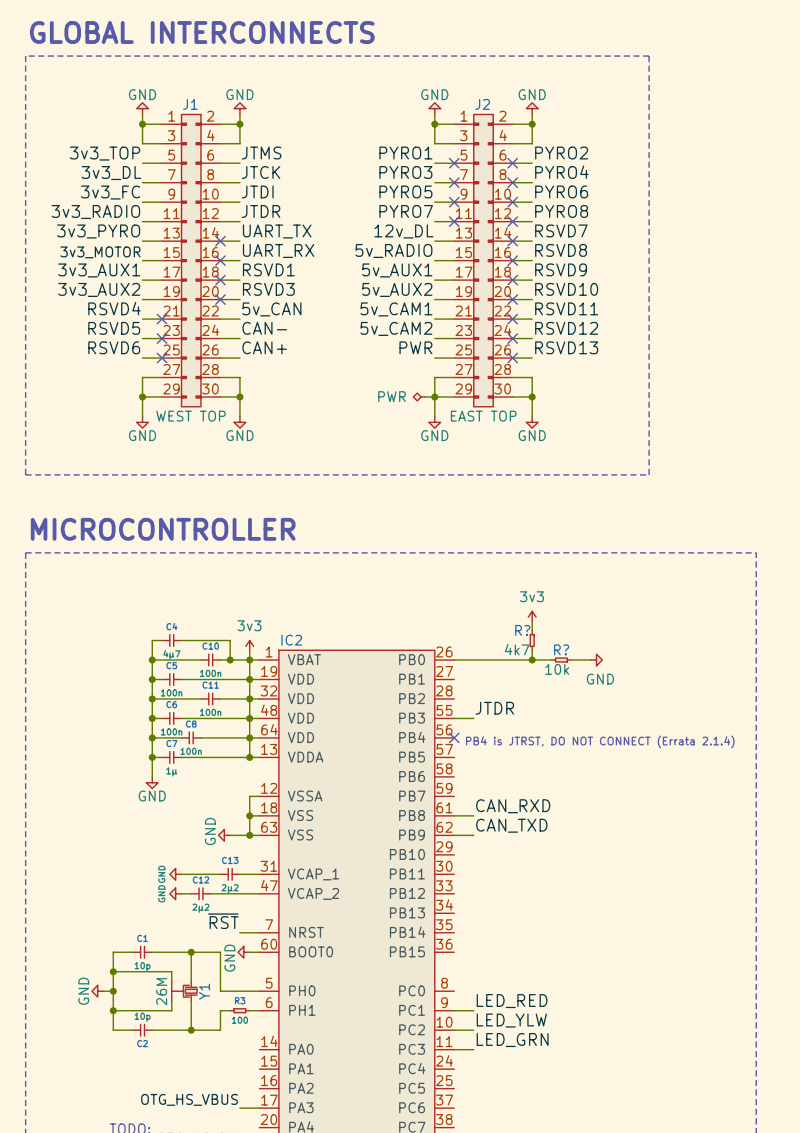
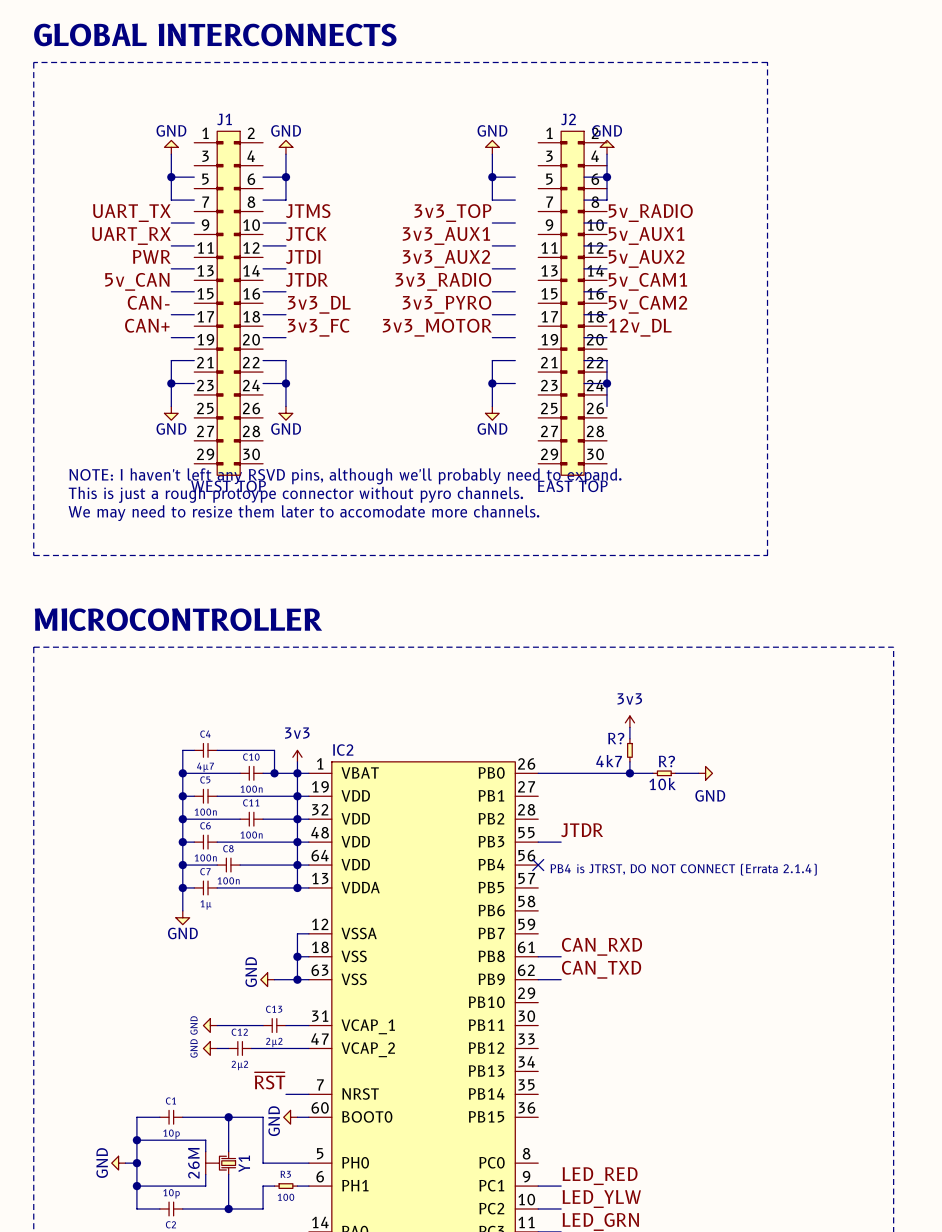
power symbol position: GND (142, 108) -> GND (171, 147)
power symbol position: GND (239, 108) -> GND (285, 147)
power symbol position: GND (434, 108) -> GND (492, 147)
power symbol position: GND (532, 108) -> GND (607, 147)
wire: (434, 114) (434, 143) (454, 143) -> none
wire: (532, 114) (532, 143) (512, 143) -> none
wire: (142, 124) (162, 124) -> none
junction position: (142, 124) -> (171, 177)
wire: (220, 124) (239, 124) -> none
junction position: (239, 124) -> (285, 177)
wire: (434, 124) (454, 124) -> none
junction position: (434, 124) -> (492, 177)
wire: (512, 124) (532, 124) -> none
junction position: (532, 124) -> (607, 177)
wire: none -> (492, 154) (492, 200) (515, 200)
wire: none -> (607, 154) (607, 200) (584, 200)
wire: (142, 143) (162, 143) -> (171, 165) (171, 200) (194, 200)
wire: (220, 143) (239, 143) -> (263, 200) (285, 200) (285, 165)
label: 3v3_TOP (105, 153) -> none
label position: JTMS (261, 153) -> JTMS (308, 211)
label: PYRO1 (405, 153) -> none
label: PYRO2 (561, 153) -> none
wire: (142, 163) (162, 163) -> none
wire: (220, 163) (239, 163) -> none
wire: (434, 163) (454, 163) -> none
no-connect mark: (454, 163) -> none
wire: (512, 163) (532, 163) -> none
no-connect mark: (512, 163) -> none
label position: JTCK (261, 172) -> JTCK (306, 234)
label: PYRO3 (405, 172) -> none
label: PYRO4 (561, 172) -> none
label position: 3v3_DL (111, 173) -> 3v3_DL (319, 304)
wire: (142, 182) (162, 182) -> none
wire: (220, 182) (239, 182) -> none
label: none -> 3v3_TOP (452, 213)
wire: (434, 182) (454, 182) -> none
no-connect mark: (454, 182) -> none
wire: (512, 182) (532, 182) -> none
no-connect mark: (512, 182) -> none
label position: JTDI (257, 191) -> JTDI (303, 256)
label: PYRO5 (405, 191) -> none
label: PYRO6 (561, 191) -> none
label position: 3v3_FC (110, 192) -> 3v3_FC (318, 327)
wire: (142, 202) (162, 202) -> none
wire: (220, 202) (239, 202) -> none
label: none -> 3v3_AUX1 (446, 235)
wire: (434, 202) (454, 202) -> none
no-connect mark: (454, 202) -> none
wire: (512, 202) (532, 202) -> none
no-connect mark: (512, 202) -> none
label position: JTDR (261, 211) -> JTDR (306, 279)
label: PYRO7 (406, 211) -> none
label: PYRO8 (561, 211) -> none
label: 3v3_RADIO (95, 212) -> none
label: none -> PWR (151, 256)
wire: (142, 221) (162, 221) -> (171, 177) (194, 177)
wire: (220, 221) (239, 221) -> (263, 177) (285, 177)
label: none -> 3v3_AUX2 (446, 258)
wire: (434, 221) (454, 221) -> (492, 177) (515, 177)
no-connect mark: (454, 221) -> none
wire: (512, 221) (532, 221) -> (584, 177) (607, 177)
no-connect mark: (512, 221) -> none
label: RSVD7 (561, 230) -> none
label: 3v3_PYRO (98, 231) -> none
label position: UART_TX (277, 231) -> UART_TX (131, 213)
label position: 12v_DL (403, 231) -> 12v_DL (640, 327)
wire: (142, 241) (162, 241) -> none
wire: (220, 241) (239, 241) -> none
no-connect mark: (220, 241) -> none
label: none -> 3v3_RADIO (443, 281)
wire: (434, 241) (454, 241) -> (492, 383) (515, 383)
wire: (512, 241) (532, 241) -> none
no-connect mark: (512, 241) -> none
label position: UART_RX (278, 250) -> UART_RX (131, 235)
label position: 5v_RADIO (393, 250) -> 5v_RADIO (650, 213)
label: RSVD8 (561, 250) -> none
label: 3v3_MOTOR (100, 252) -> none
wire: (142, 260) (162, 260) -> (171, 223) (194, 223)
wire: (220, 260) (239, 260) -> (263, 223) (285, 223)
no-connect mark: (220, 260) -> none
label: none -> 3v3_PYRO (446, 304)
wire: (434, 260) (454, 260) -> (492, 223) (515, 223)
wire: (512, 260) (532, 260) -> (584, 223) (607, 223)
no-connect mark: (512, 260) -> none
label: RSVD1 (268, 269) -> none
label: RSVD9 (561, 269) -> none
label: 3v3_AUX1 (99, 270) -> none
label position: 5v_AUX1 (397, 270) -> 5v_AUX1 (646, 235)
wire: (142, 280) (162, 280) -> (171, 245) (194, 245)
wire: (220, 280) (239, 280) -> (263, 245) (285, 245)
no-connect mark: (220, 280) -> none
label: none -> 3v3_MOTOR (437, 327)
wire: (434, 280) (454, 280) -> (492, 245) (515, 245)
wire: (512, 280) (532, 280) -> (584, 245) (607, 245)
no-connect mark: (512, 280) -> none
label: 3v3_AUX2 (99, 289) -> none
label: RSVD3 (268, 289) -> none
label position: 5v_AUX2 (397, 289) -> 5v_AUX2 (646, 258)
label: RSVD10 (566, 289) -> none
wire: (142, 299) (162, 299) -> (171, 268) (194, 268)
wire: (220, 299) (239, 299) -> (263, 268) (285, 268)
no-connect mark: (220, 299) -> none
wire: (434, 299) (454, 299) -> (492, 268) (515, 268)
wire: (512, 299) (532, 299) -> (584, 268) (607, 268)
no-connect mark: (512, 299) -> none
label: RSVD4 (114, 308) -> none
label: RSVD11 (566, 308) -> none
label position: 5v_CAN (271, 309) -> 5v_CAN (137, 281)
label position: 5v_CAM1 (396, 309) -> 5v_CAM1 (647, 281)
wire: (142, 319) (162, 319) -> (171, 291) (194, 291)
no-connect mark: (162, 319) -> none
wire: (220, 319) (239, 319) -> (263, 291) (285, 291)
wire: (434, 319) (454, 319) -> (492, 291) (515, 291)
wire: (512, 319) (532, 319) -> (584, 291) (607, 291)
no-connect mark: (512, 319) -> none
label: RSVD5 (114, 328) -> none
junction: none -> (171, 383)
junction: none -> (285, 383)
label position: CAN- (264, 328) -> CAN- (148, 302)
label position: 5v_CAM2 (396, 328) -> 5v_CAM2 (647, 304)
junction: none -> (492, 383)
junction: none -> (607, 383)
label: RSVD12 (566, 328) -> none
wire: (142, 338) (162, 338) -> (171, 314) (194, 314)
no-connect mark: (162, 338) -> none
wire: (220, 338) (239, 338) -> (263, 314) (285, 314)
wire: (434, 338) (454, 338) -> (492, 314) (515, 314)
wire: (512, 338) (532, 338) -> (584, 314) (607, 314)
no-connect mark: (512, 338) -> none
label: RSVD6 (114, 347) -> none
label position: CAN+ (264, 347) -> CAN+ (147, 325)
label: PWR (415, 347) -> none
label: RSVD13 (566, 347) -> none
power symbol: none -> GND (171, 413)
power symbol: none -> GND (285, 413)
power symbol: none -> GND (492, 413)
wire: (142, 358) (162, 358) -> (171, 337) (194, 337)
no-connect mark: (162, 358) -> none
wire: (220, 358) (239, 358) -> (263, 337) (285, 337)
wire: (434, 358) (454, 358) -> (492, 337) (515, 337)
wire: (512, 358) (532, 358) -> (584, 337) (607, 337)
no-connect mark: (512, 358) -> none
wire: (162, 377) (142, 377) (142, 416) -> (194, 360) (171, 360) (171, 406)
wire: (220, 377) (239, 377) (239, 416) -> (263, 360) (285, 360) (285, 406)
wire: (454, 377) (434, 377) (434, 416) -> (515, 360) (492, 360) (492, 406)
wire: (512, 377) (532, 377) (532, 416) -> (584, 360) (607, 360) (607, 406)
wire: (142, 397) (162, 397) -> (171, 383) (194, 383)
junction: (142, 397) -> none
wire: (220, 397) (239, 397) -> (263, 383) (285, 383)
junction: (239, 397) -> none
power symbol: PWR (419, 397) -> none
wire: (425, 397) (454, 397) -> none
junction: (434, 397) -> none
wire: (512, 397) (532, 397) -> (584, 383) (607, 383)
junction: (532, 397) -> none
text: none -> NOTE: I haven't left any RSVD pins, although we'll probably need to expand. (345, 476)
power symbol: GND (142, 422) -> none
power symbol: GND (239, 422) -> none
power symbol: GND (434, 422) -> none
power symbol: GND (532, 422) -> none
text: none -> This is just a rough protoype connector without pyro channels. (295, 494)
text: none -> We may need to resize them later to accomodate more channels. (303, 513)

